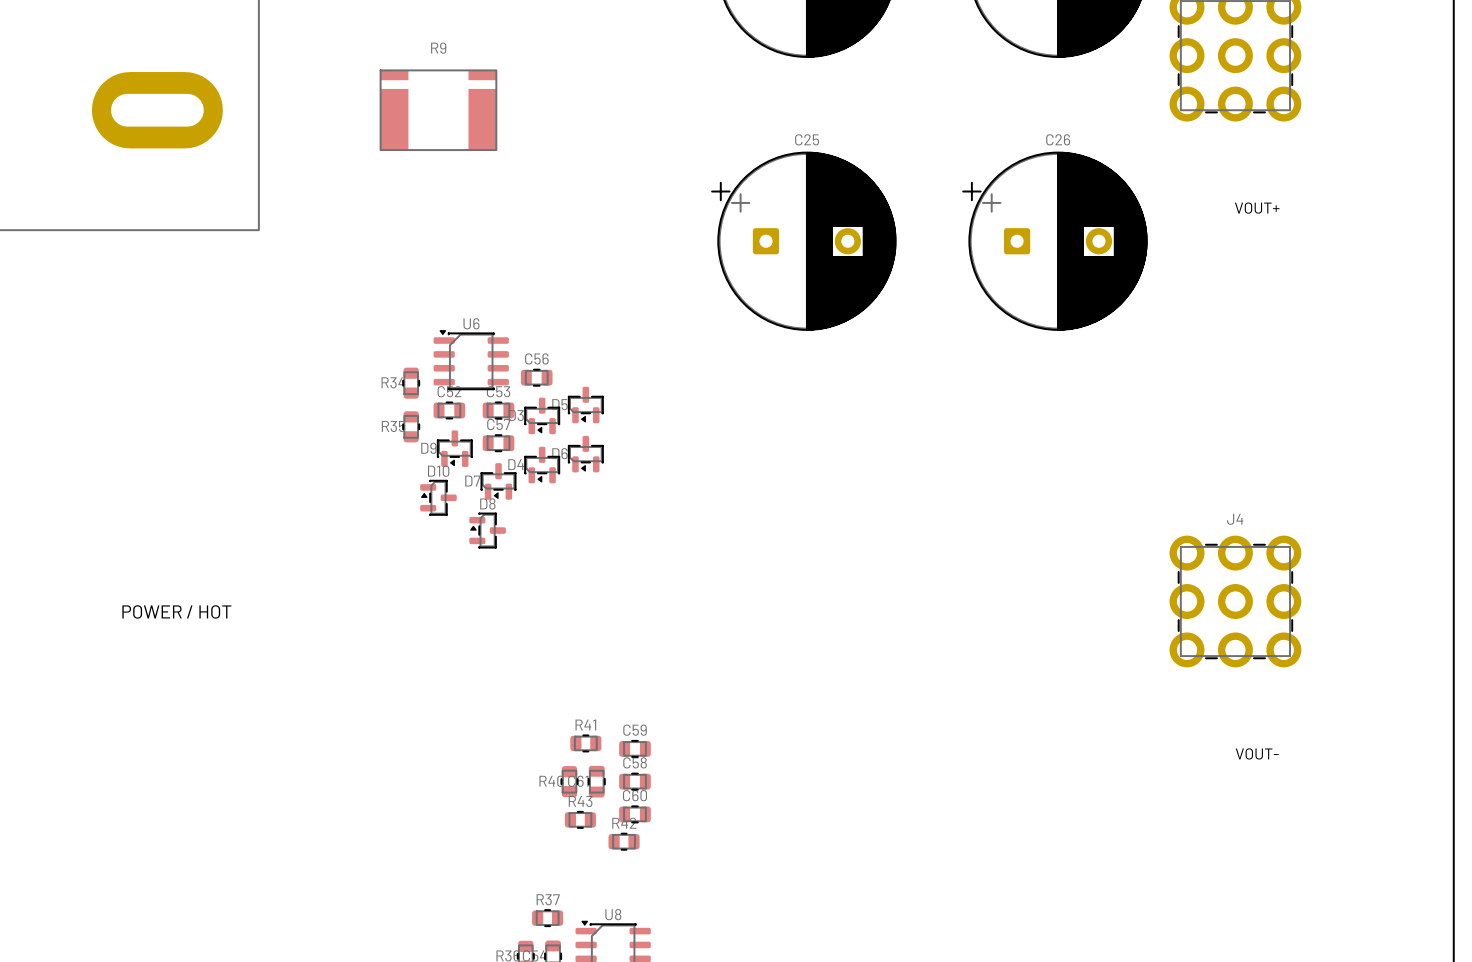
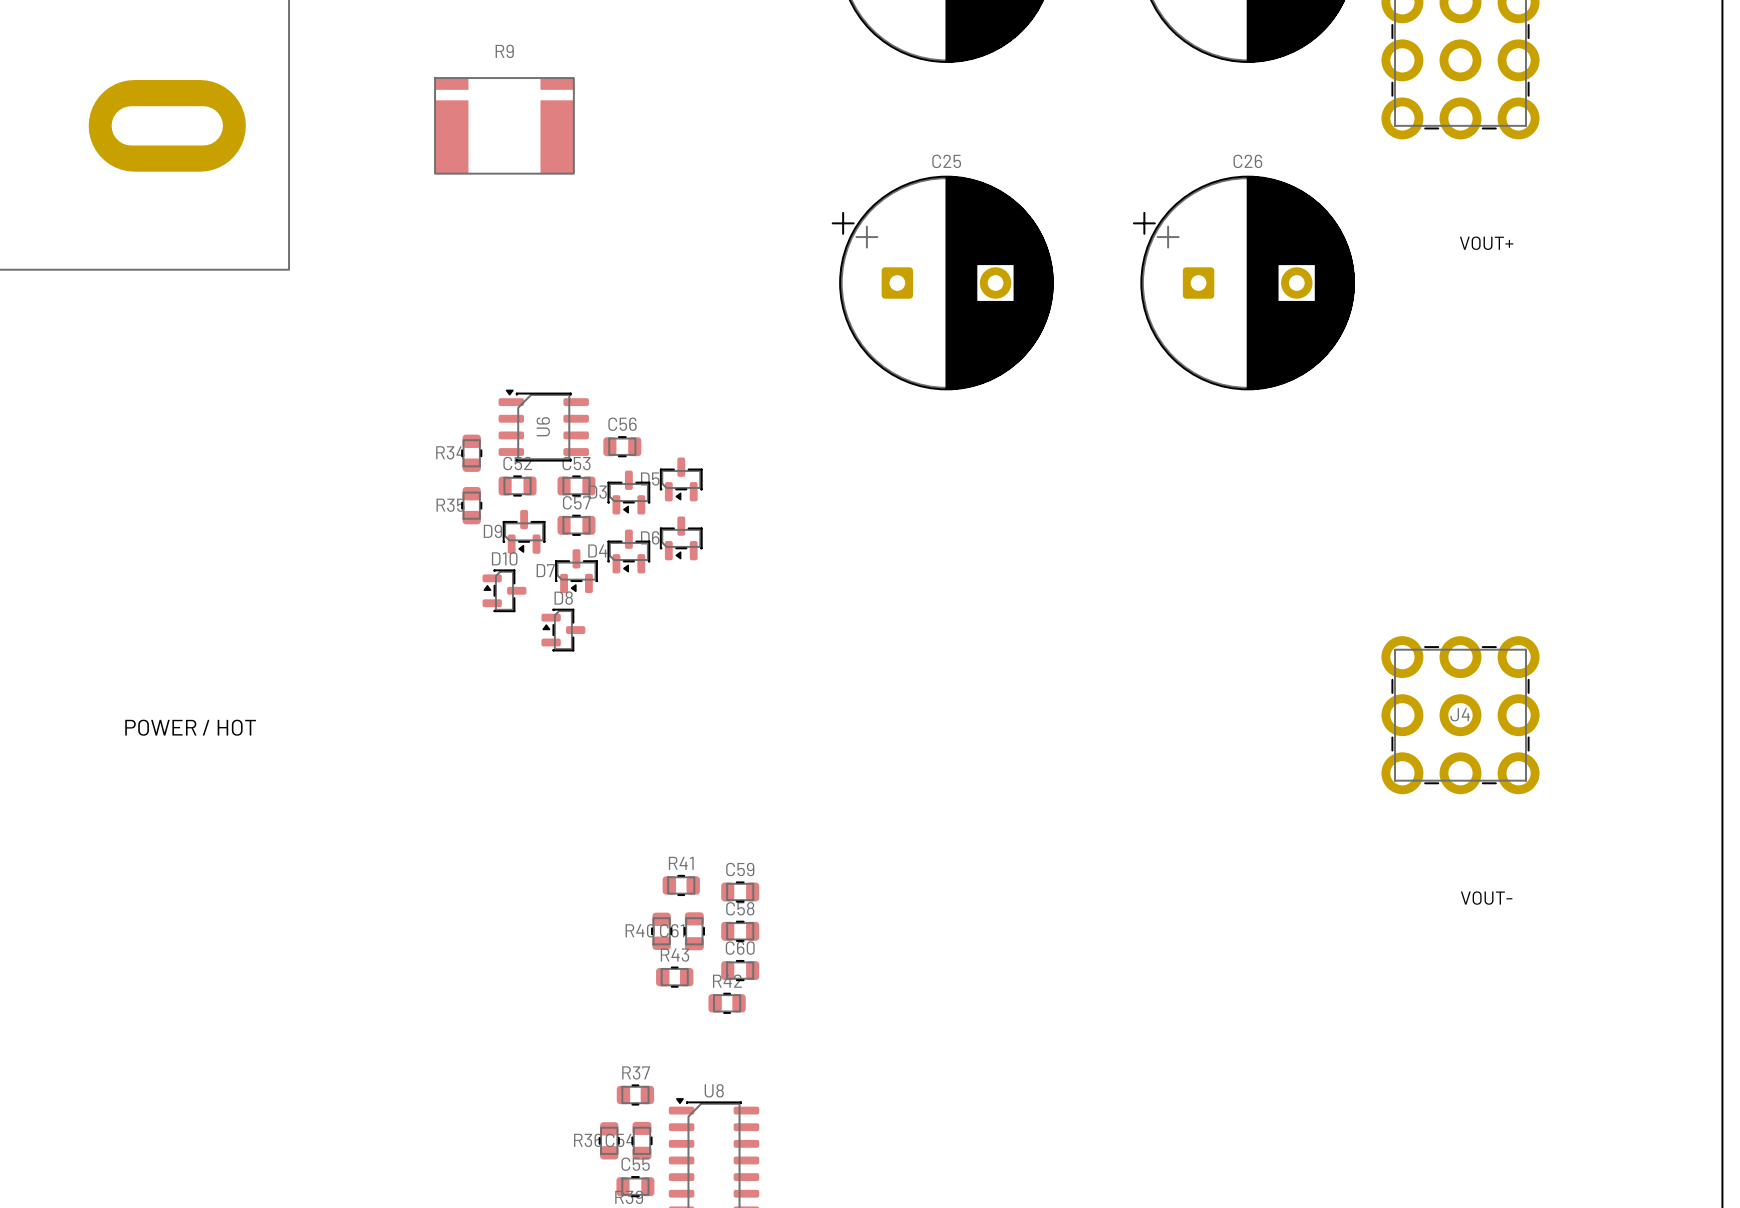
U6 name rotation: 0° (471, 323) -> 90° counterclockwise (543, 426)
U6 name position: U6 (471, 323) -> U6 (543, 426)
J4 name position: J4 (1235, 519) -> J4 (1460, 714)

